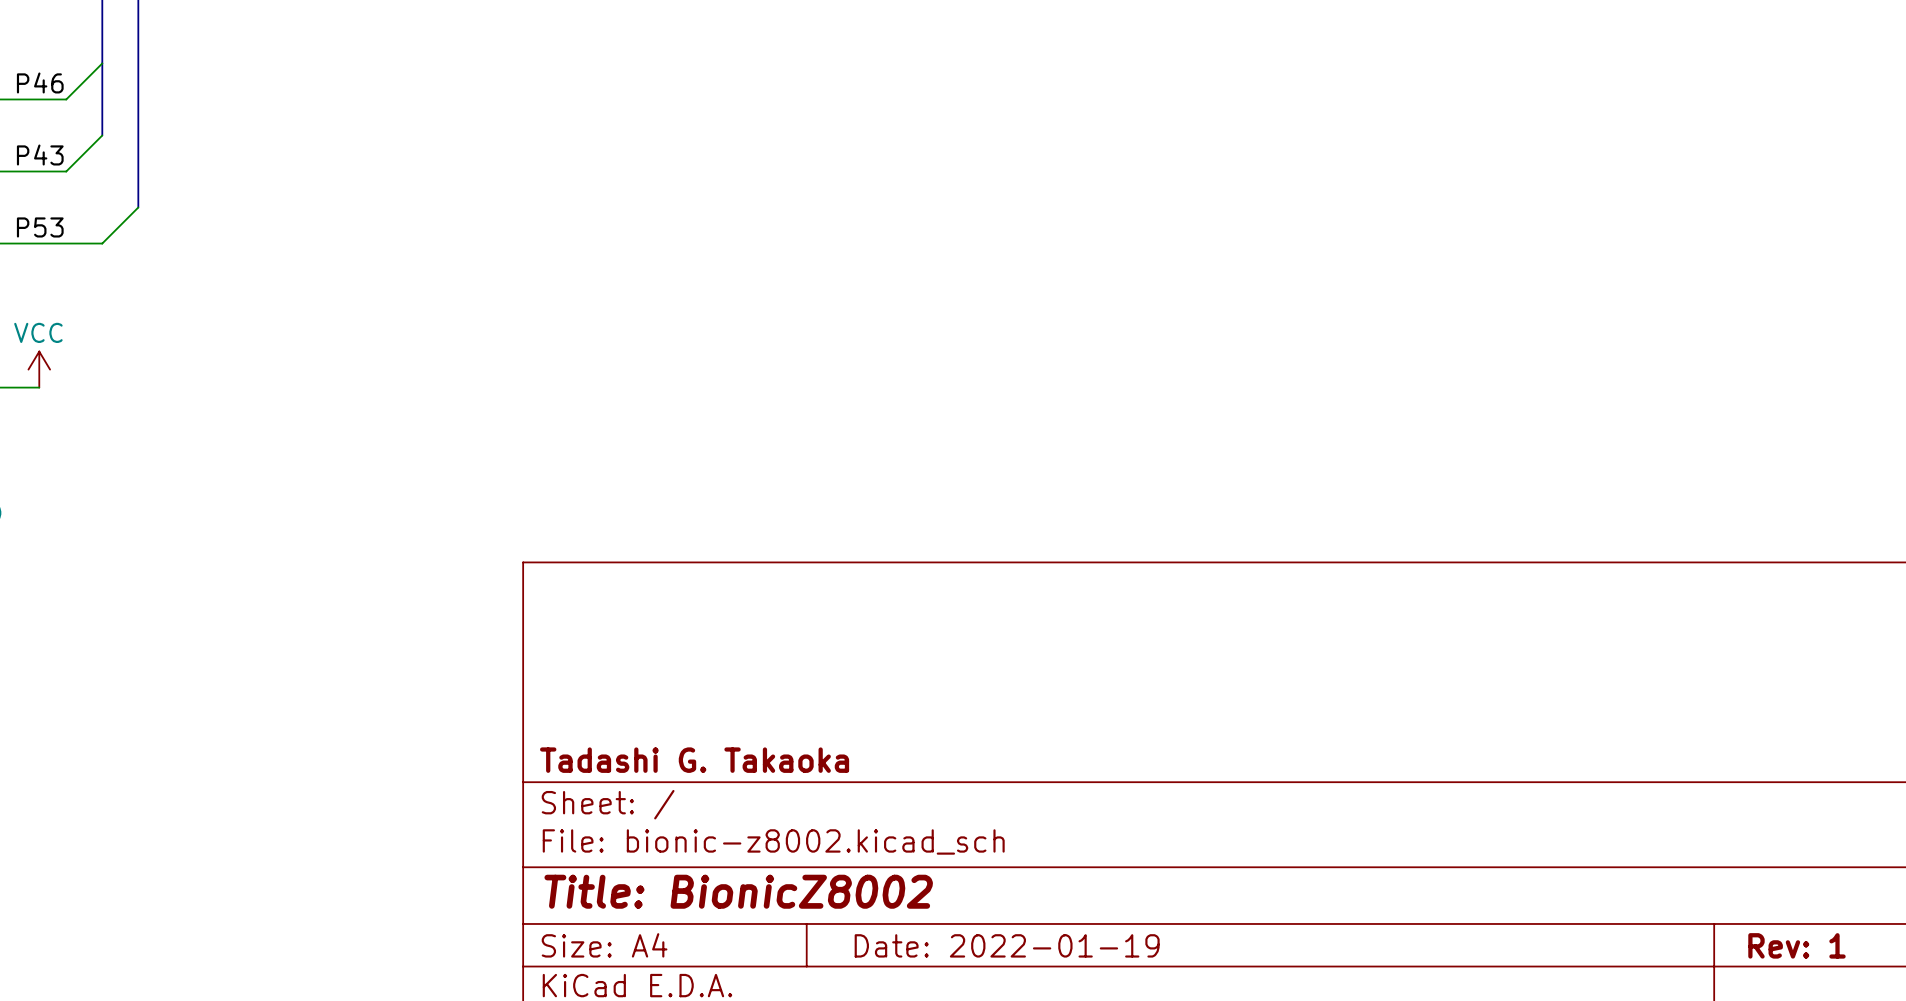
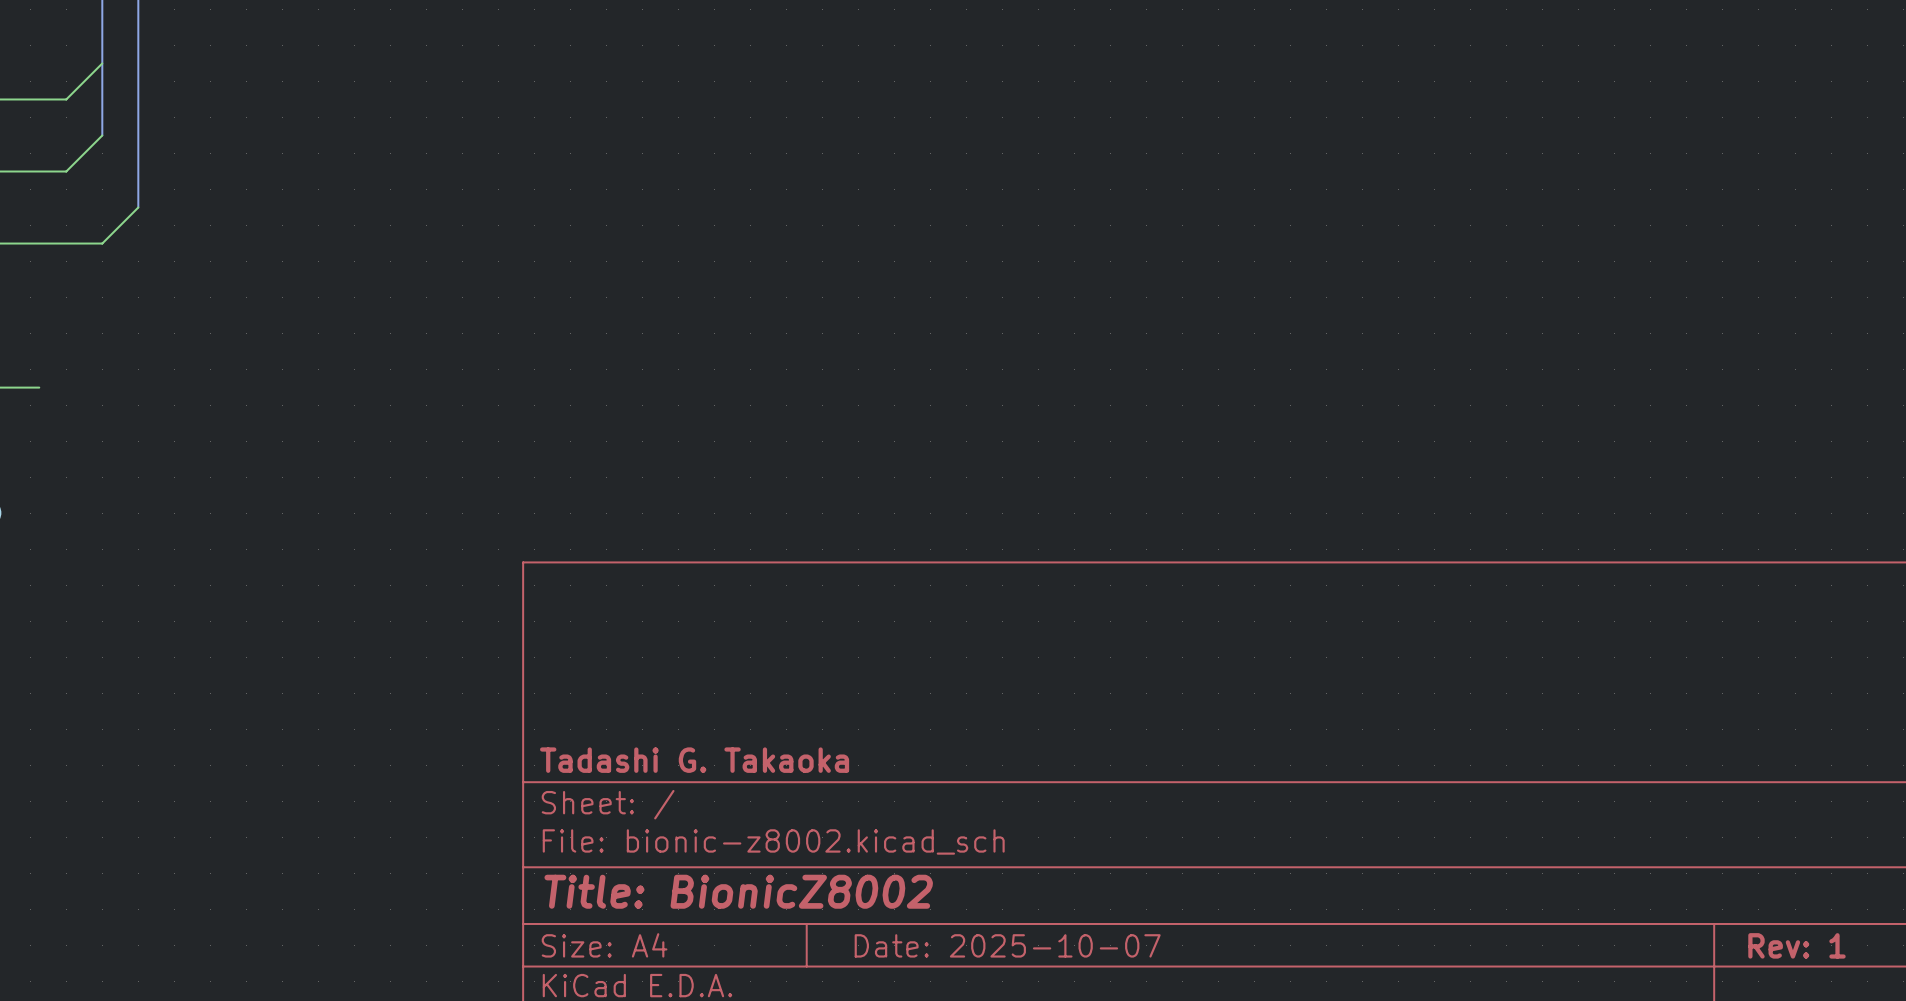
label: P46 (40, 82) -> none
label: P43 (40, 155) -> none
label: P53 (40, 227) -> none
power symbol: VCC (39, 369) -> none
title block: Date: 2022-01-19 (1007, 945) -> Date: 2025-10-07 (1007, 945)

